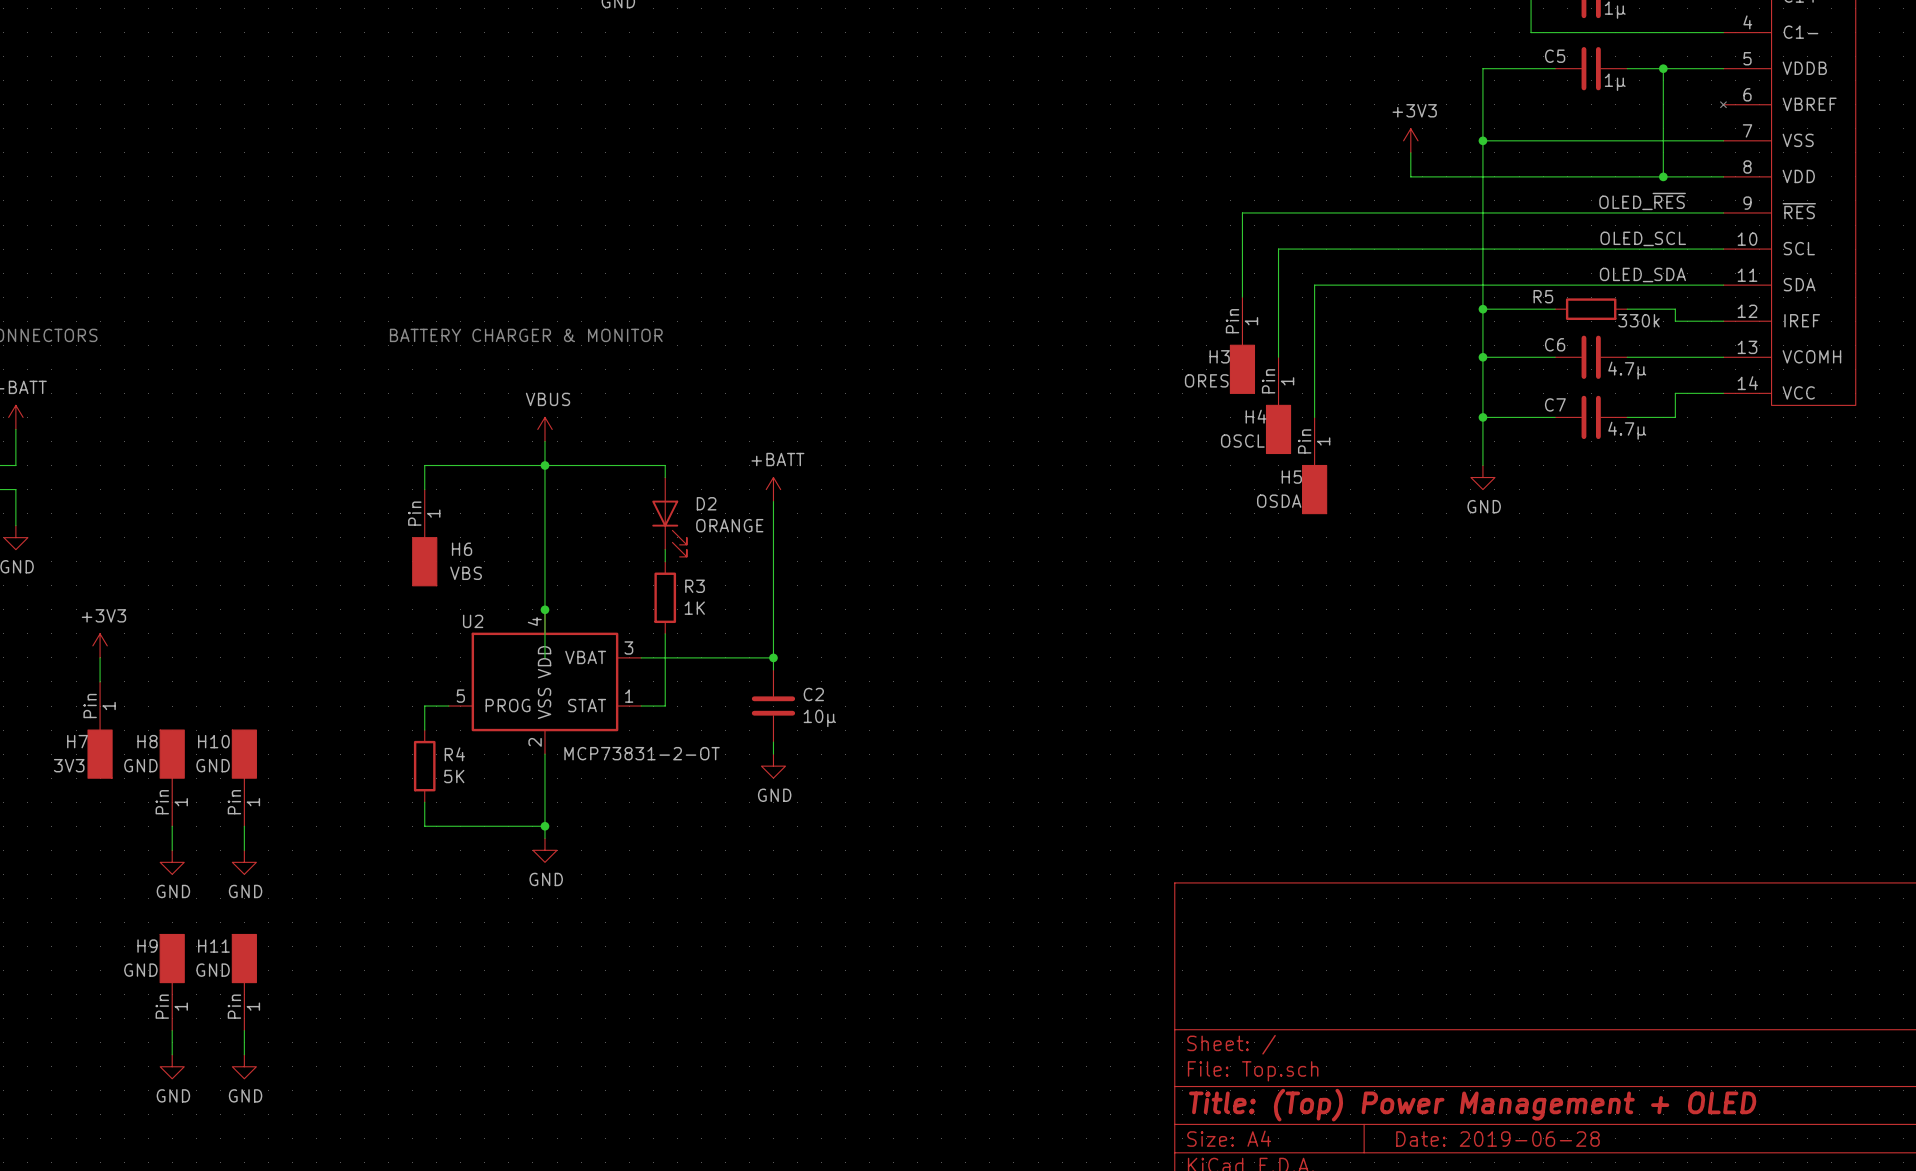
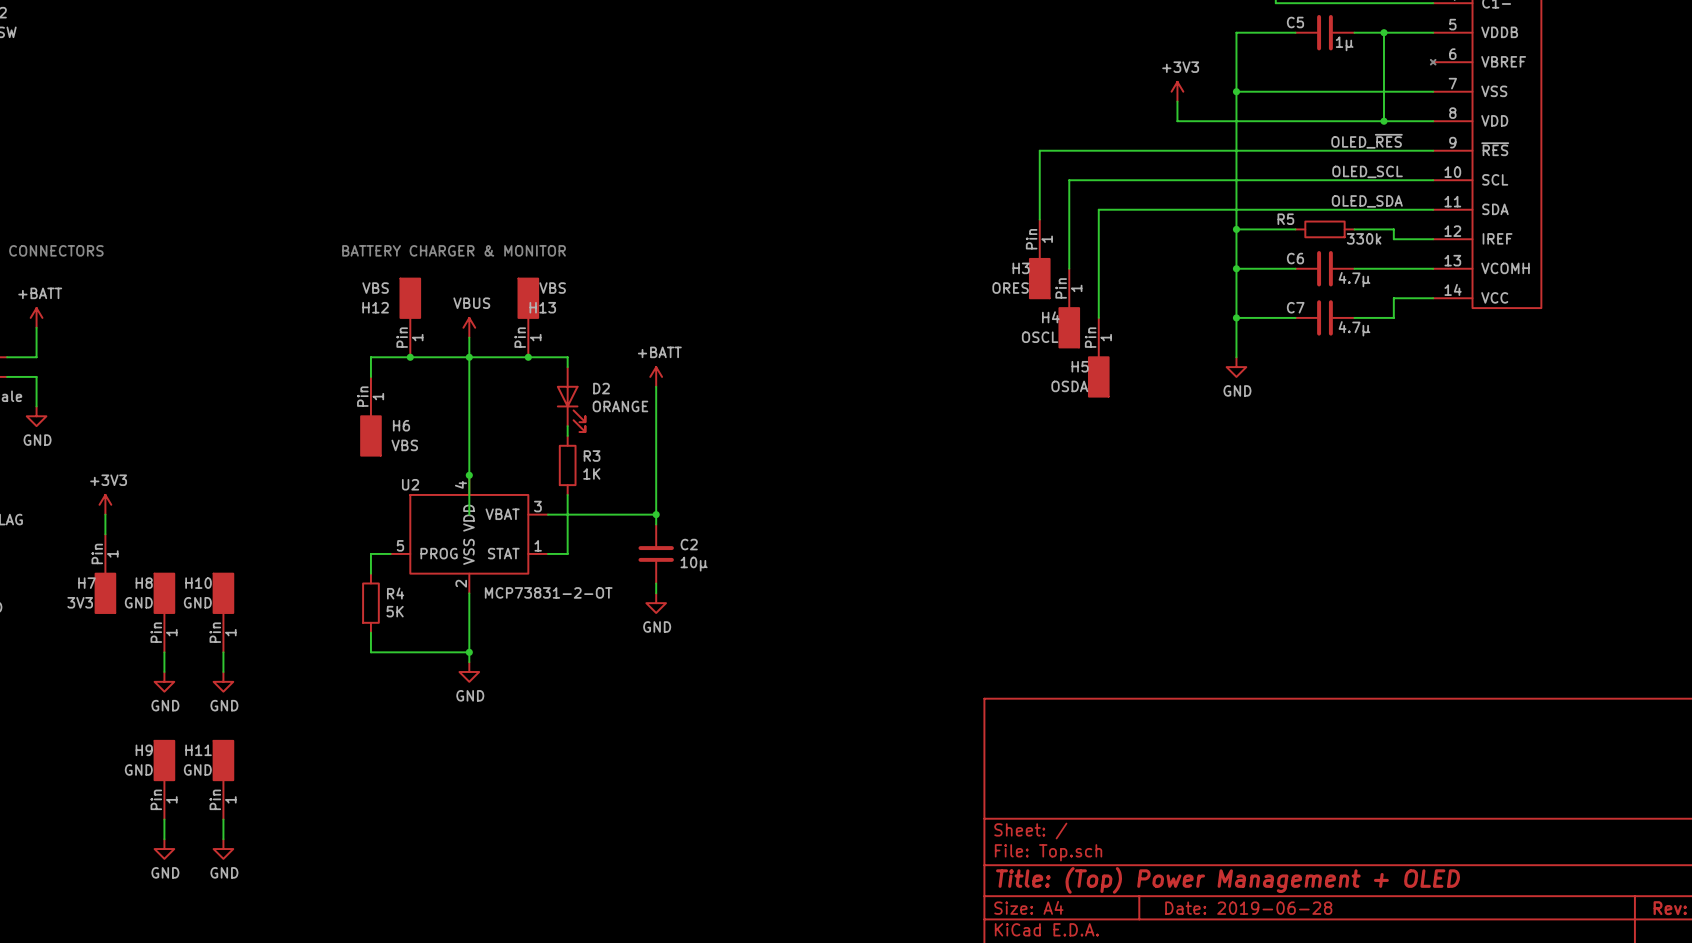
H12: none -> VBS (410, 317)
H13: none -> VBS (528, 317)
junction: none -> (410, 357)
junction: none -> (528, 357)

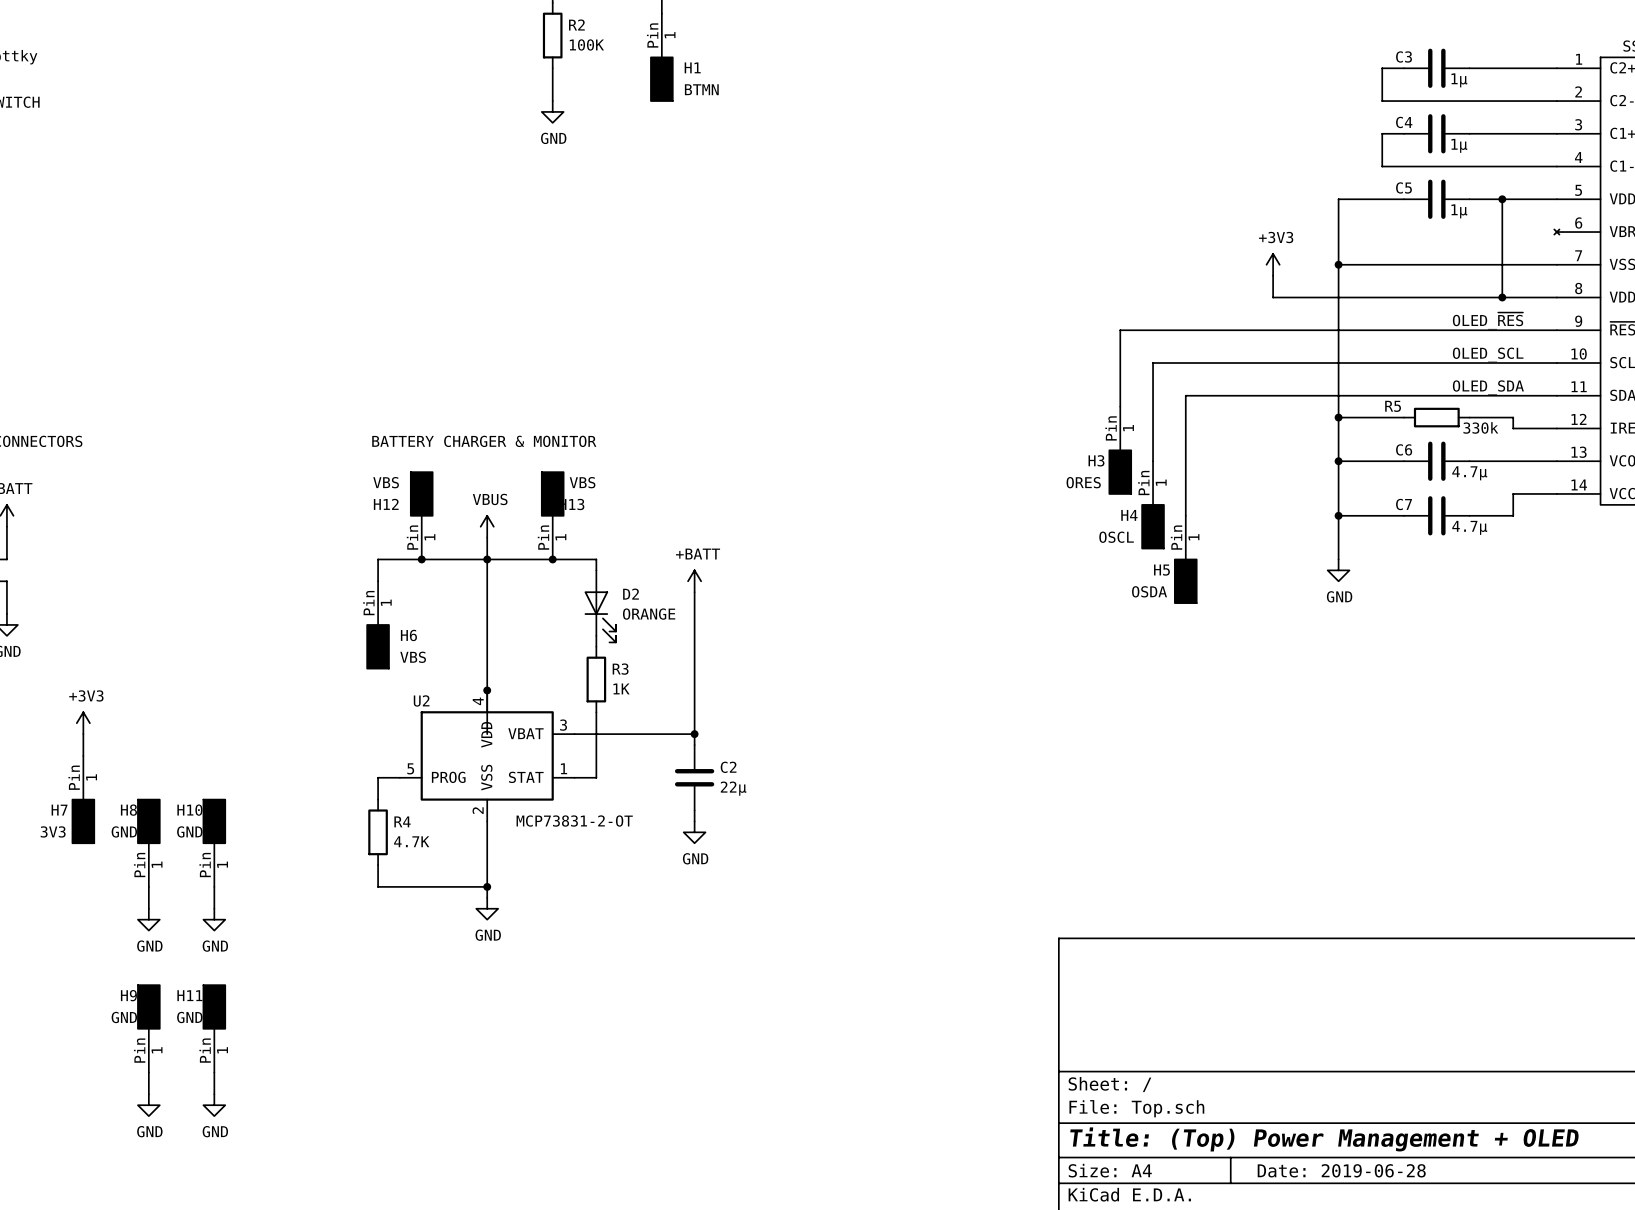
C2 value: 10µ (694, 564) -> 22µ (733, 788)
R4 value: 5K (395, 611) -> 4.7K (411, 841)

